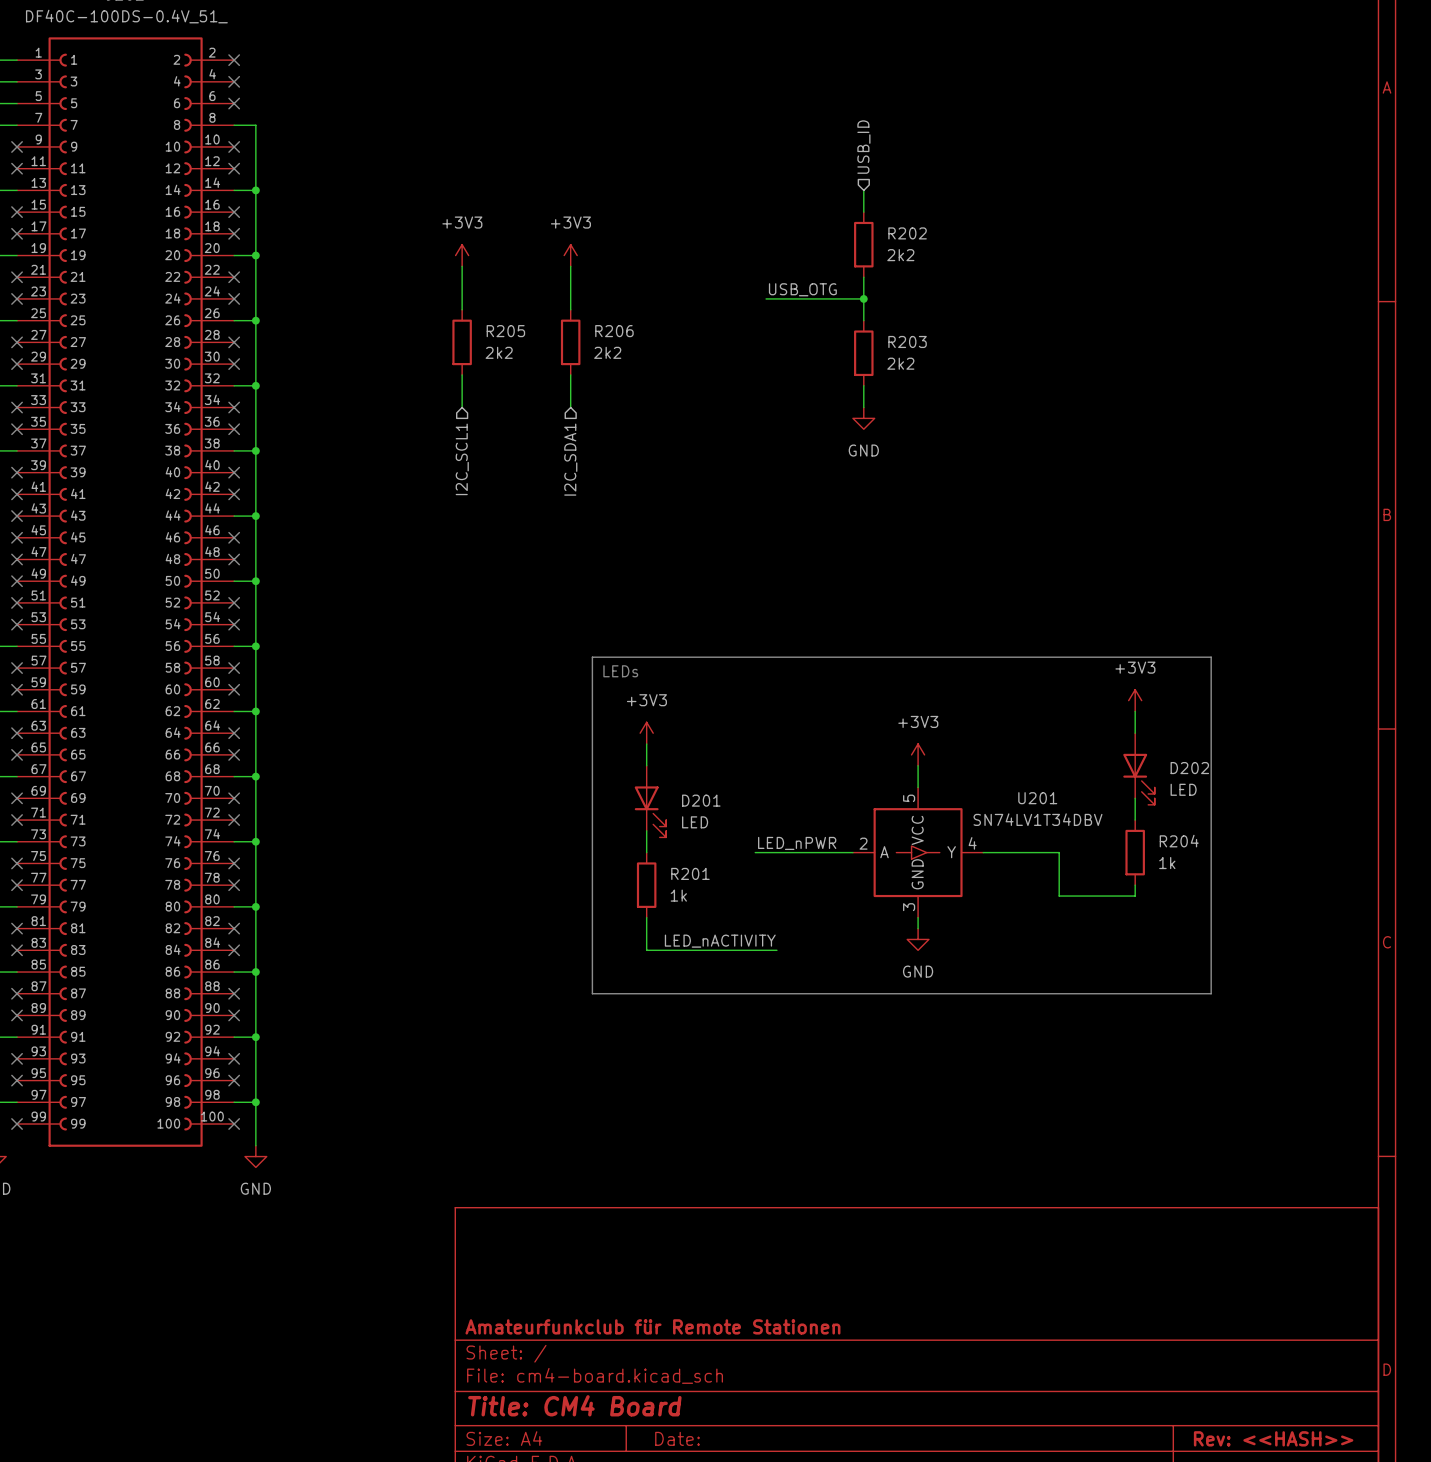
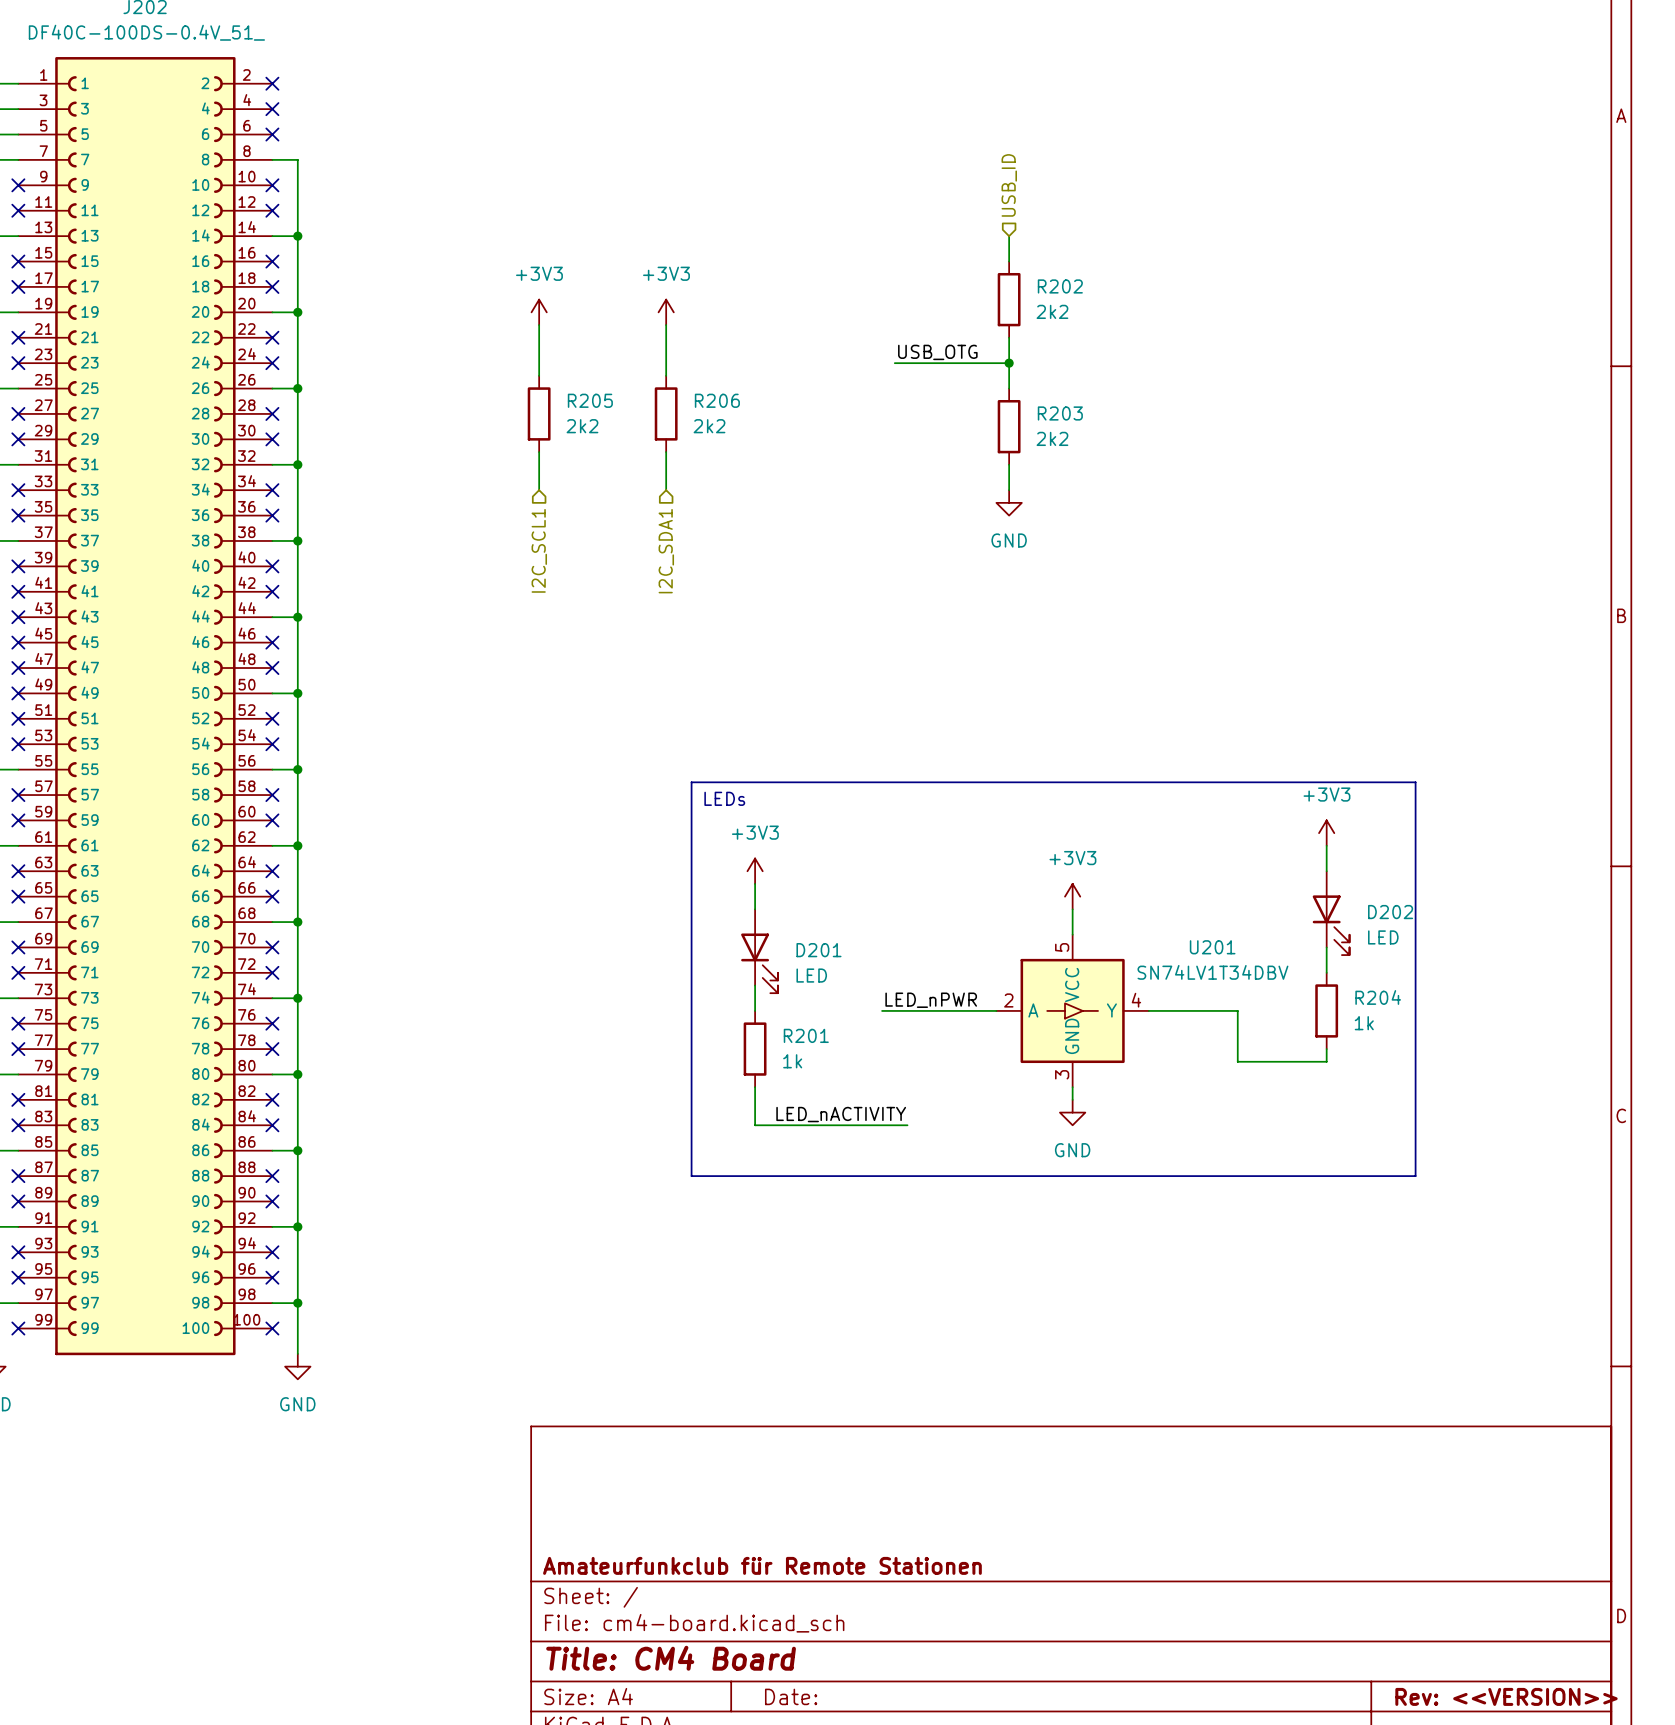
title block: Rev: <<HASH>> (1273, 1438) -> Rev: <<VERSION>> (1506, 1696)

